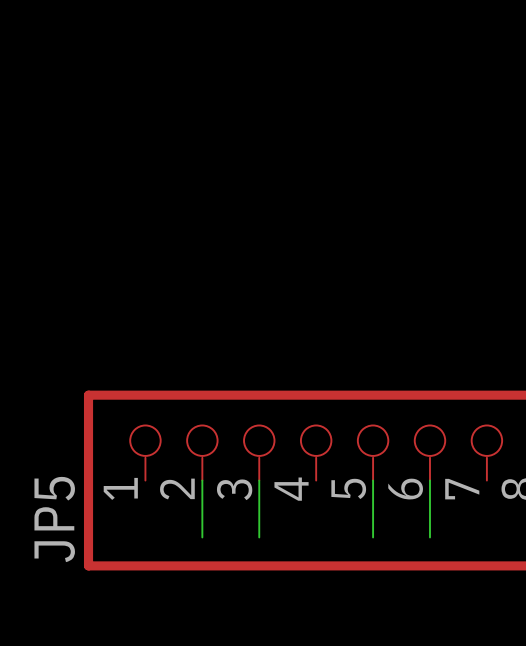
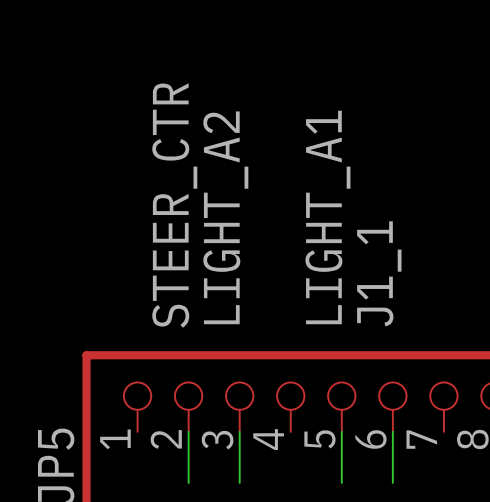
label: none -> STEER_CTR (174, 205)
label: none -> LIGHT_A2 (225, 217)
label: none -> LIGHT_A1 (327, 217)
label: none -> J1_1 (379, 273)

